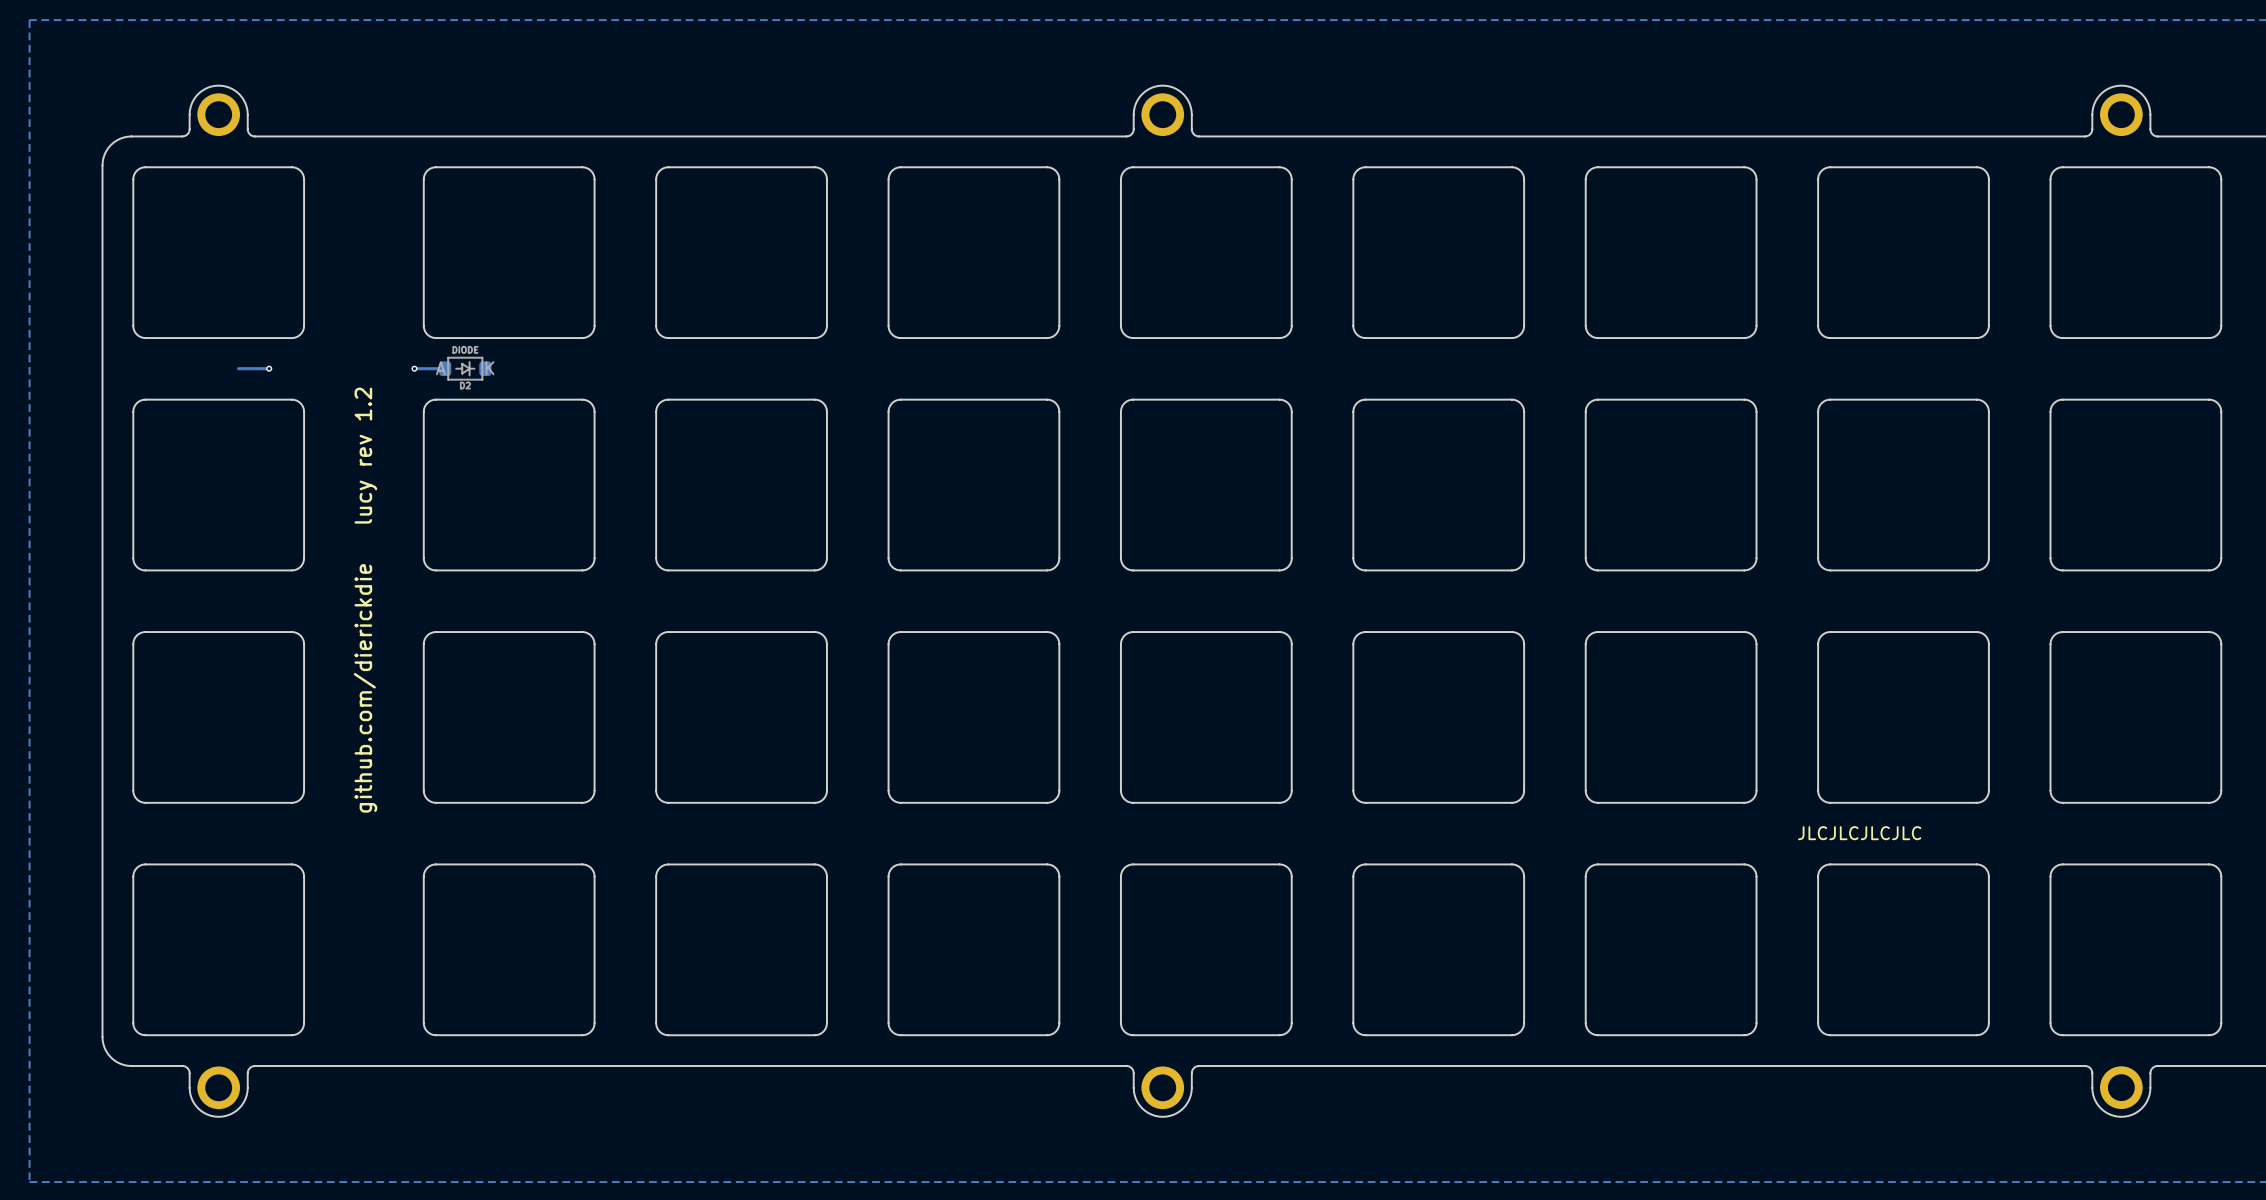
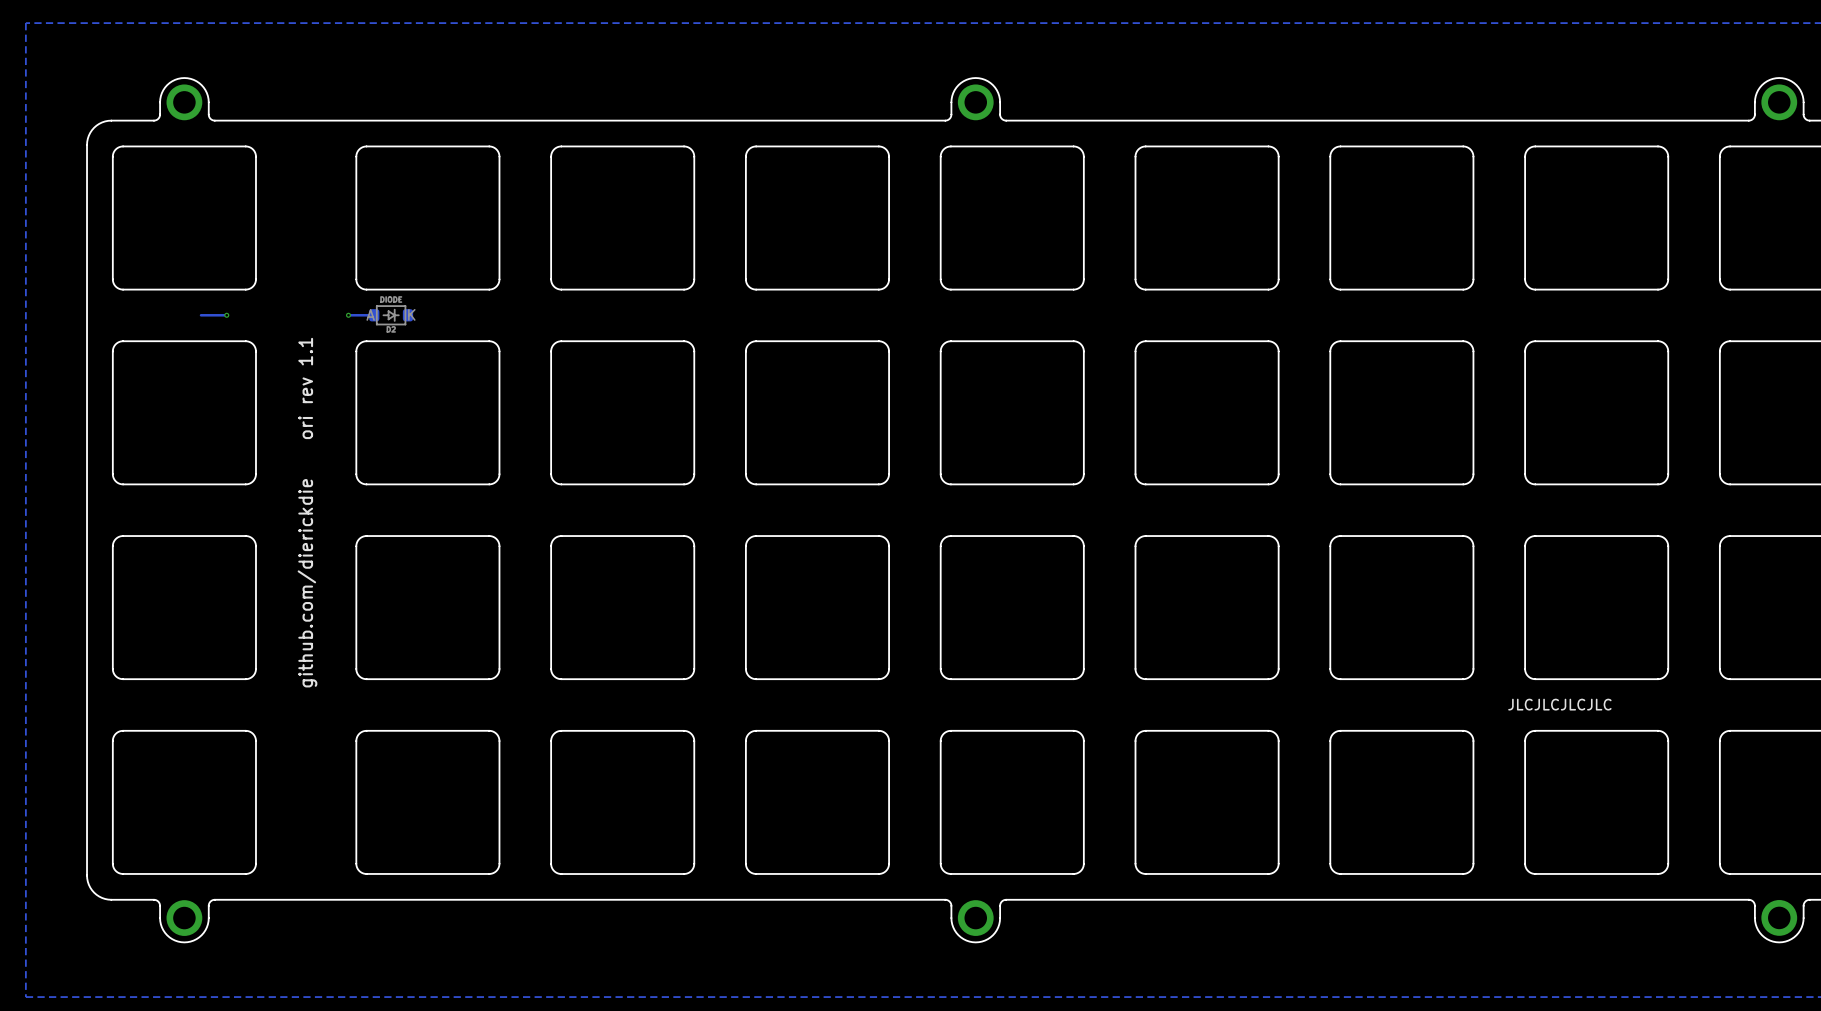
text: lucy rev 1.2 (365, 455) -> ori rev 1.1 (305, 388)

